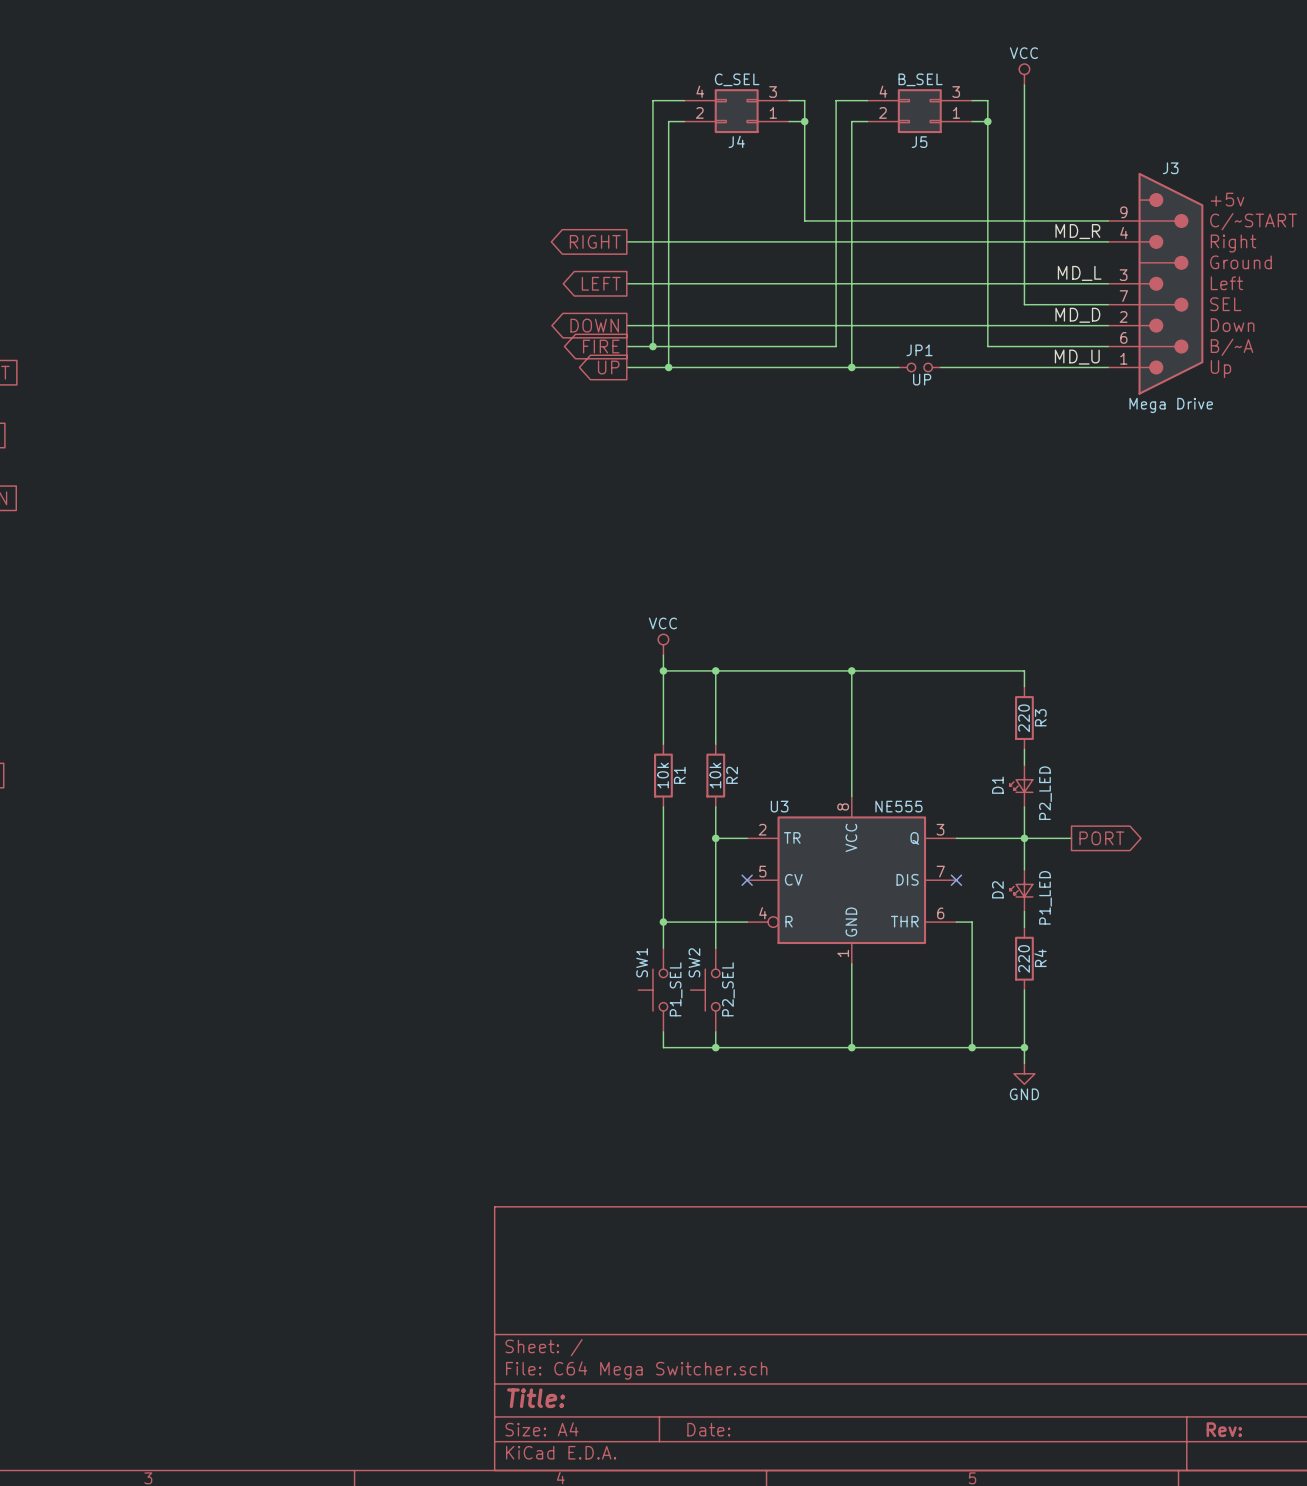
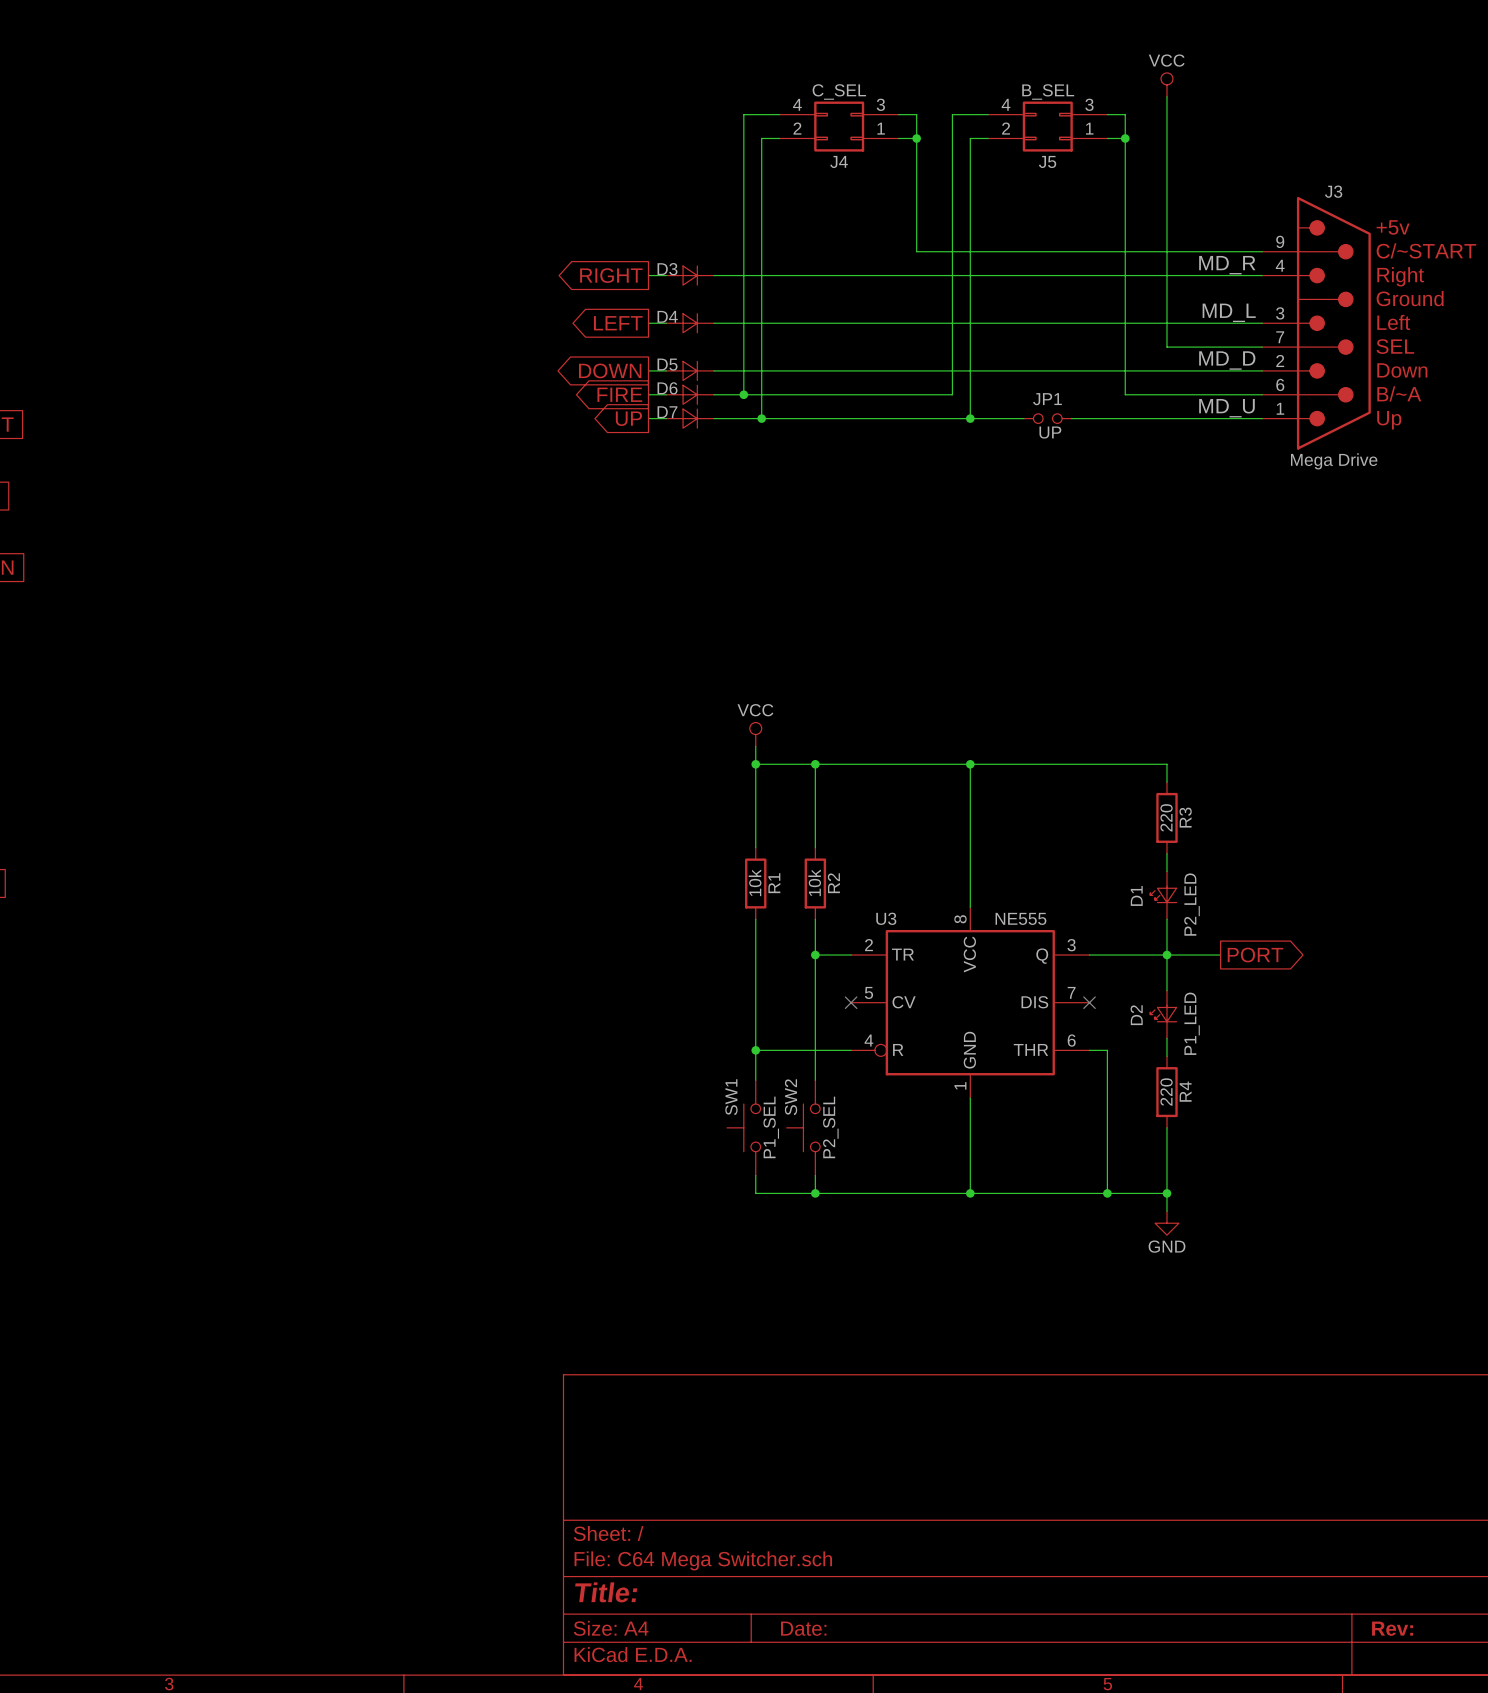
global label position: RIGHT (595, 241) -> RIGHT (611, 275)
D3: none -> (690, 275)
wire: none -> (648, 323) (666, 323)
global label position: LEFT (601, 283) -> LEFT (618, 323)
D4: none -> (690, 323)
wire: none -> (648, 370) (666, 370)
global label position: DOWN (594, 325) -> DOWN (610, 370)
D5: none -> (690, 370)
wire: none -> (648, 394) (666, 394)
global label position: FIRE (601, 346) -> FIRE (619, 394)
D6: none -> (690, 394)
wire: none -> (648, 418) (666, 418)
D7: none -> (690, 418)
global label position: UP (608, 367) -> UP (628, 418)

